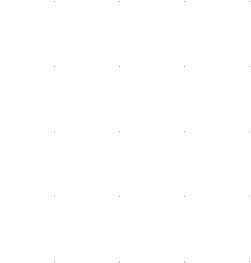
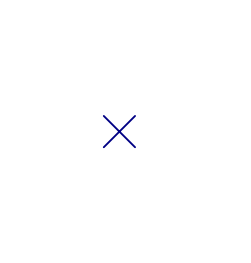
no-connect mark: none -> (119, 131)

